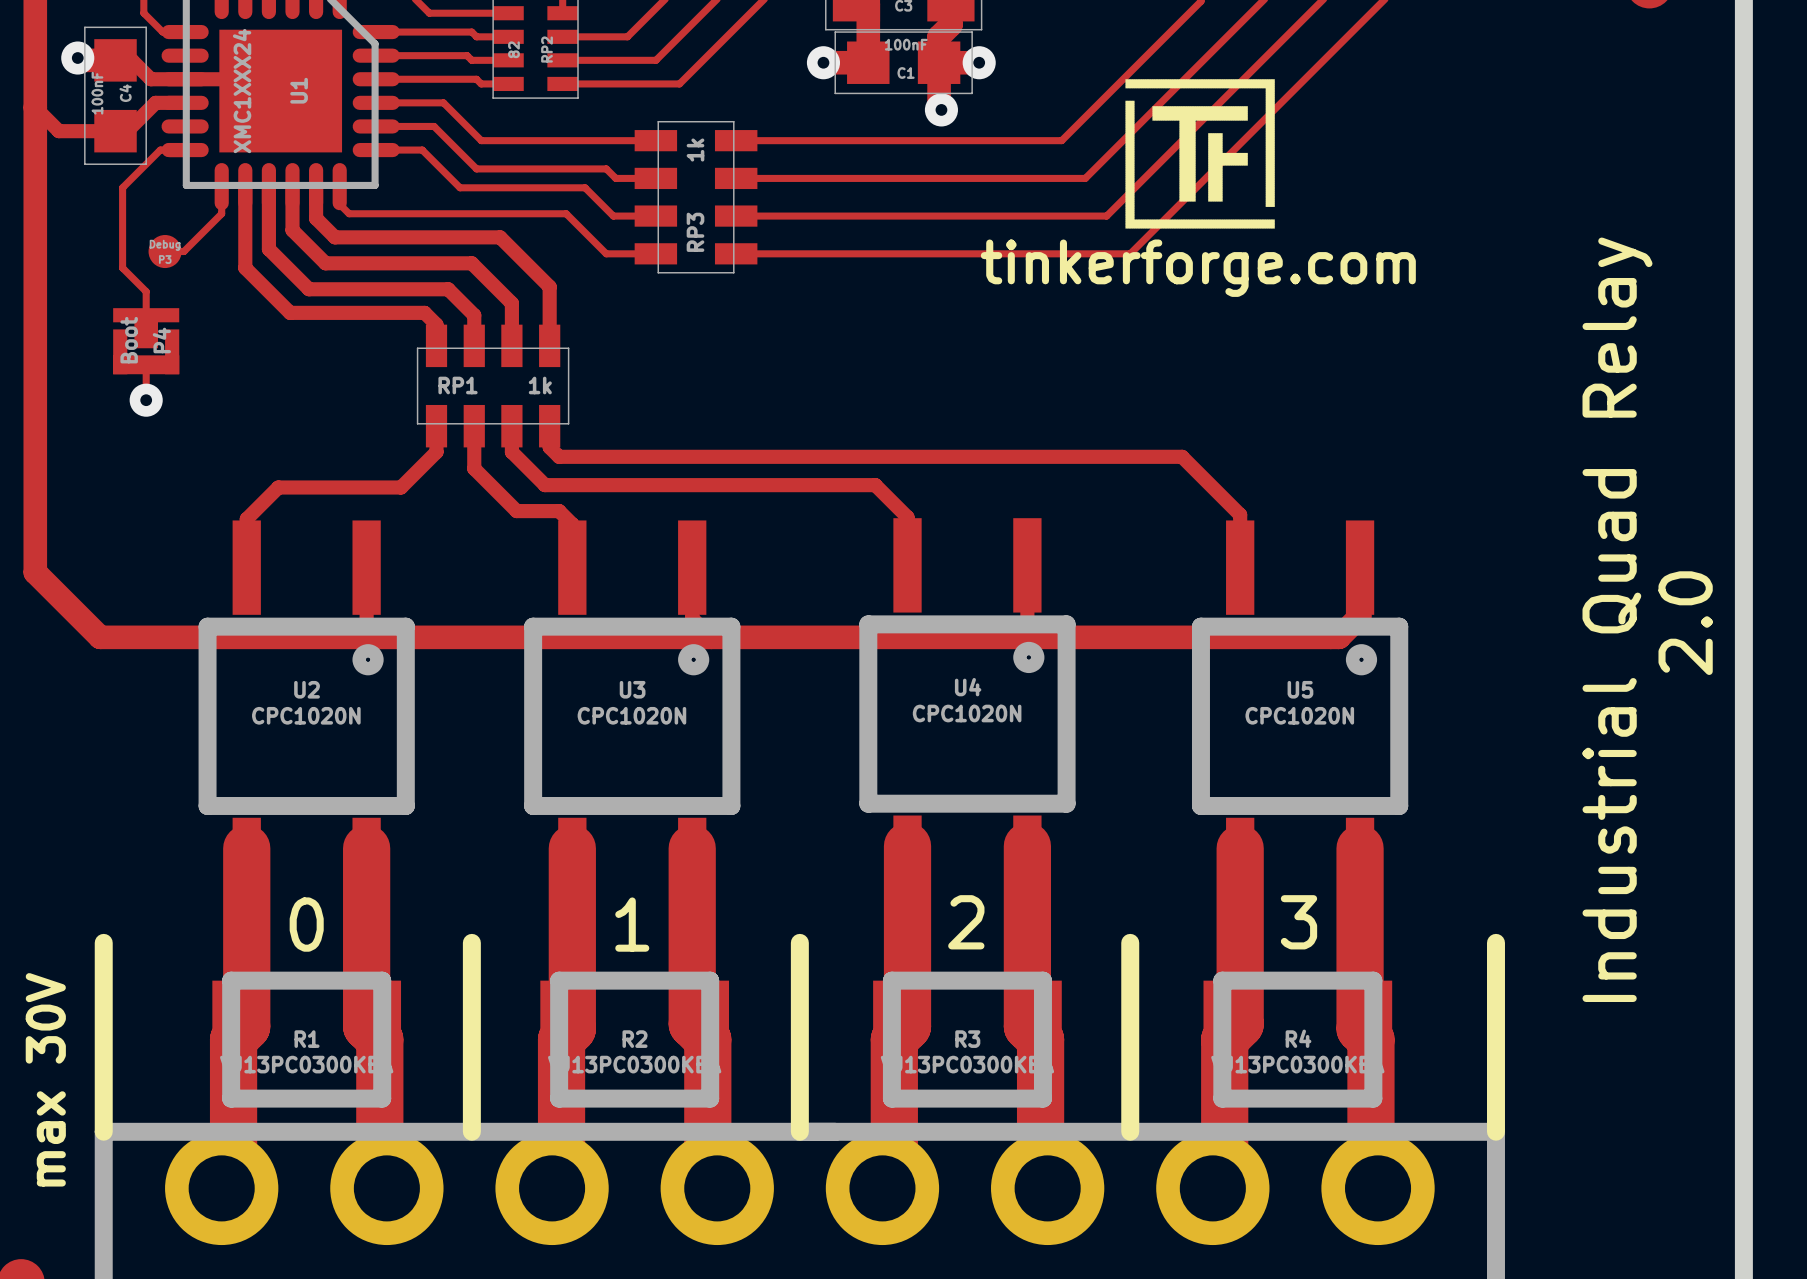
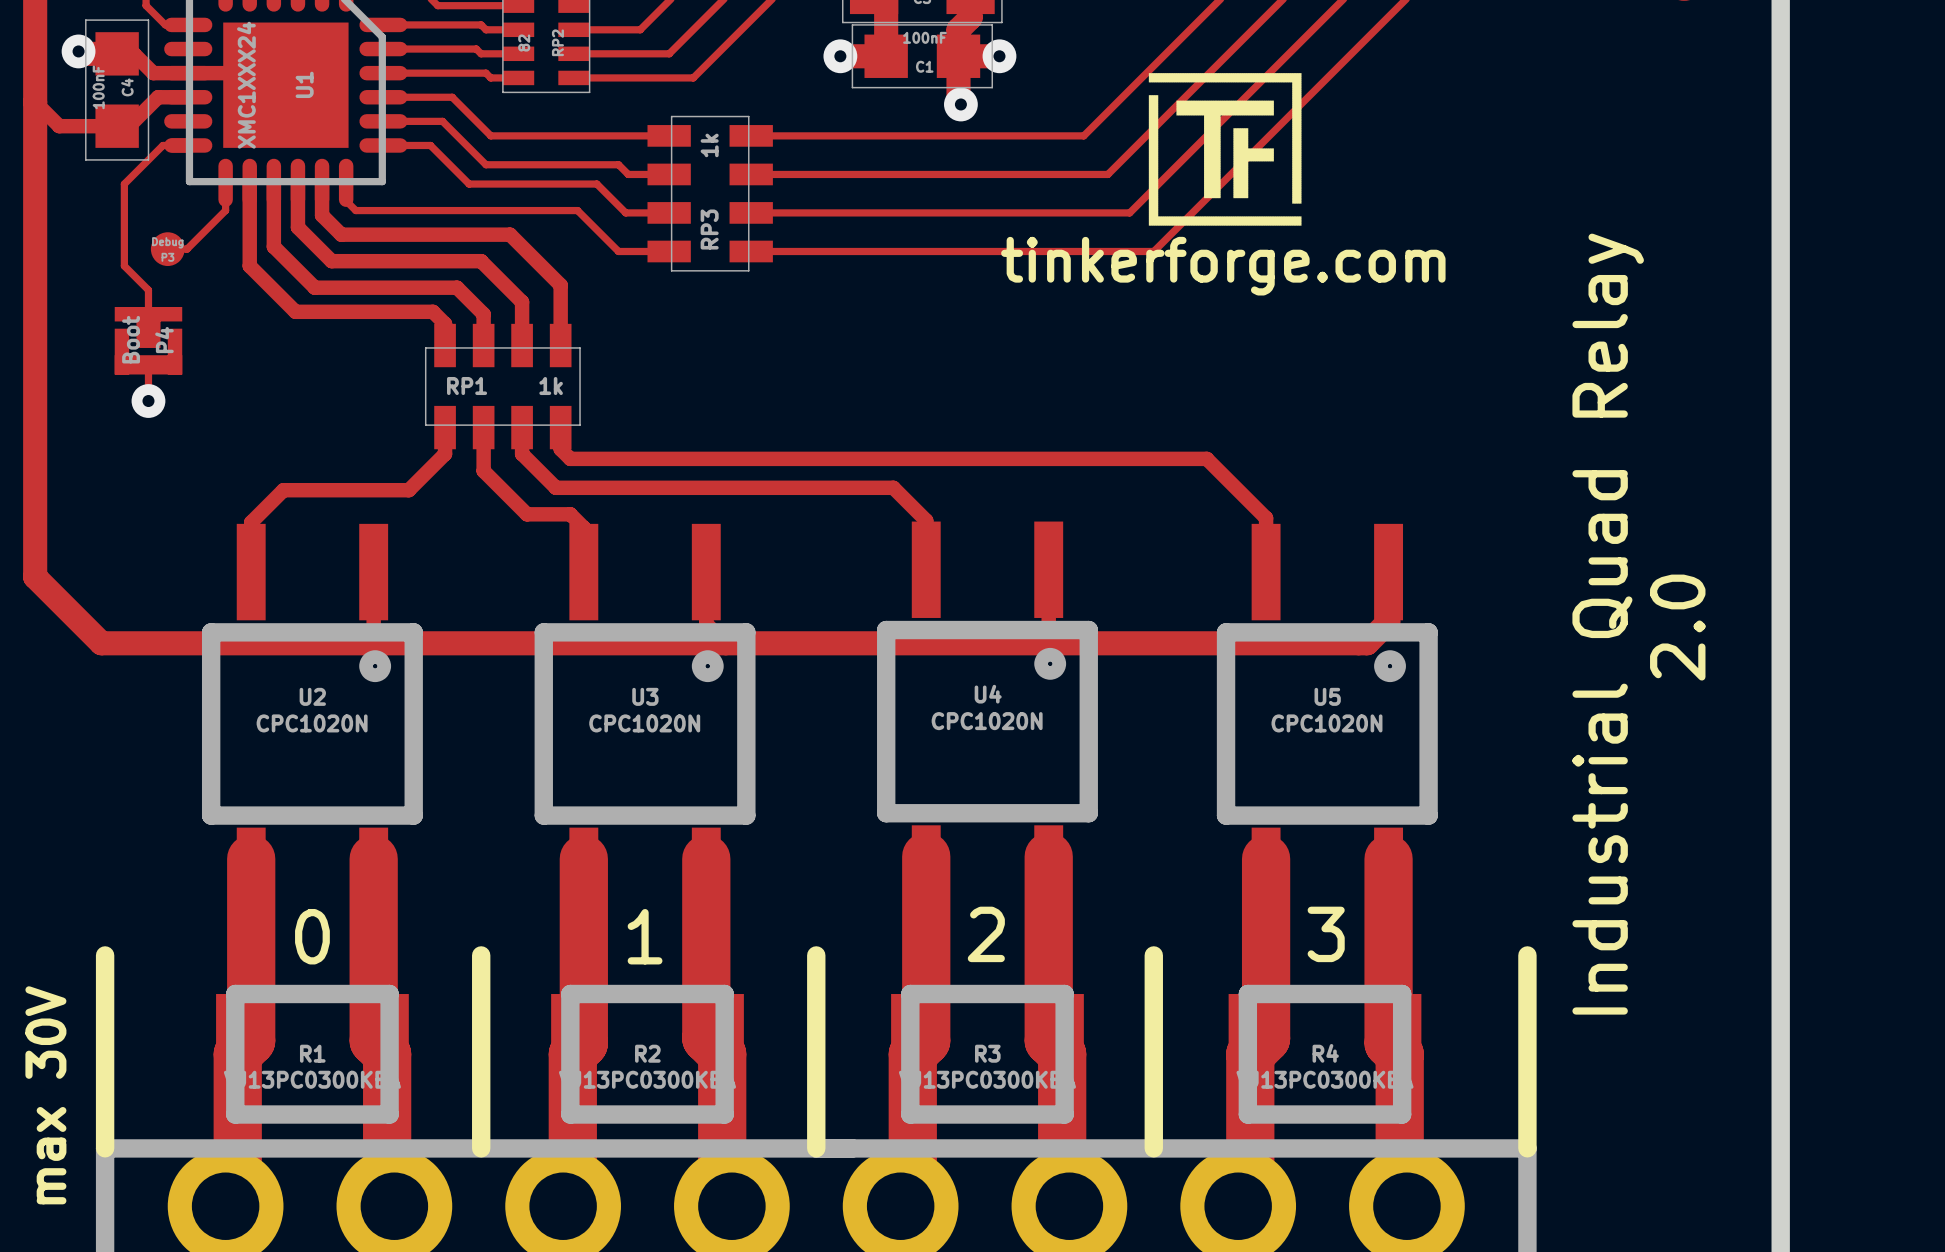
text position: Industrial Quad Relay (1617, 619) -> Industrial Quad Relay (1608, 624)
text position: 2.0 (1685, 623) -> 2.0 (1677, 627)

